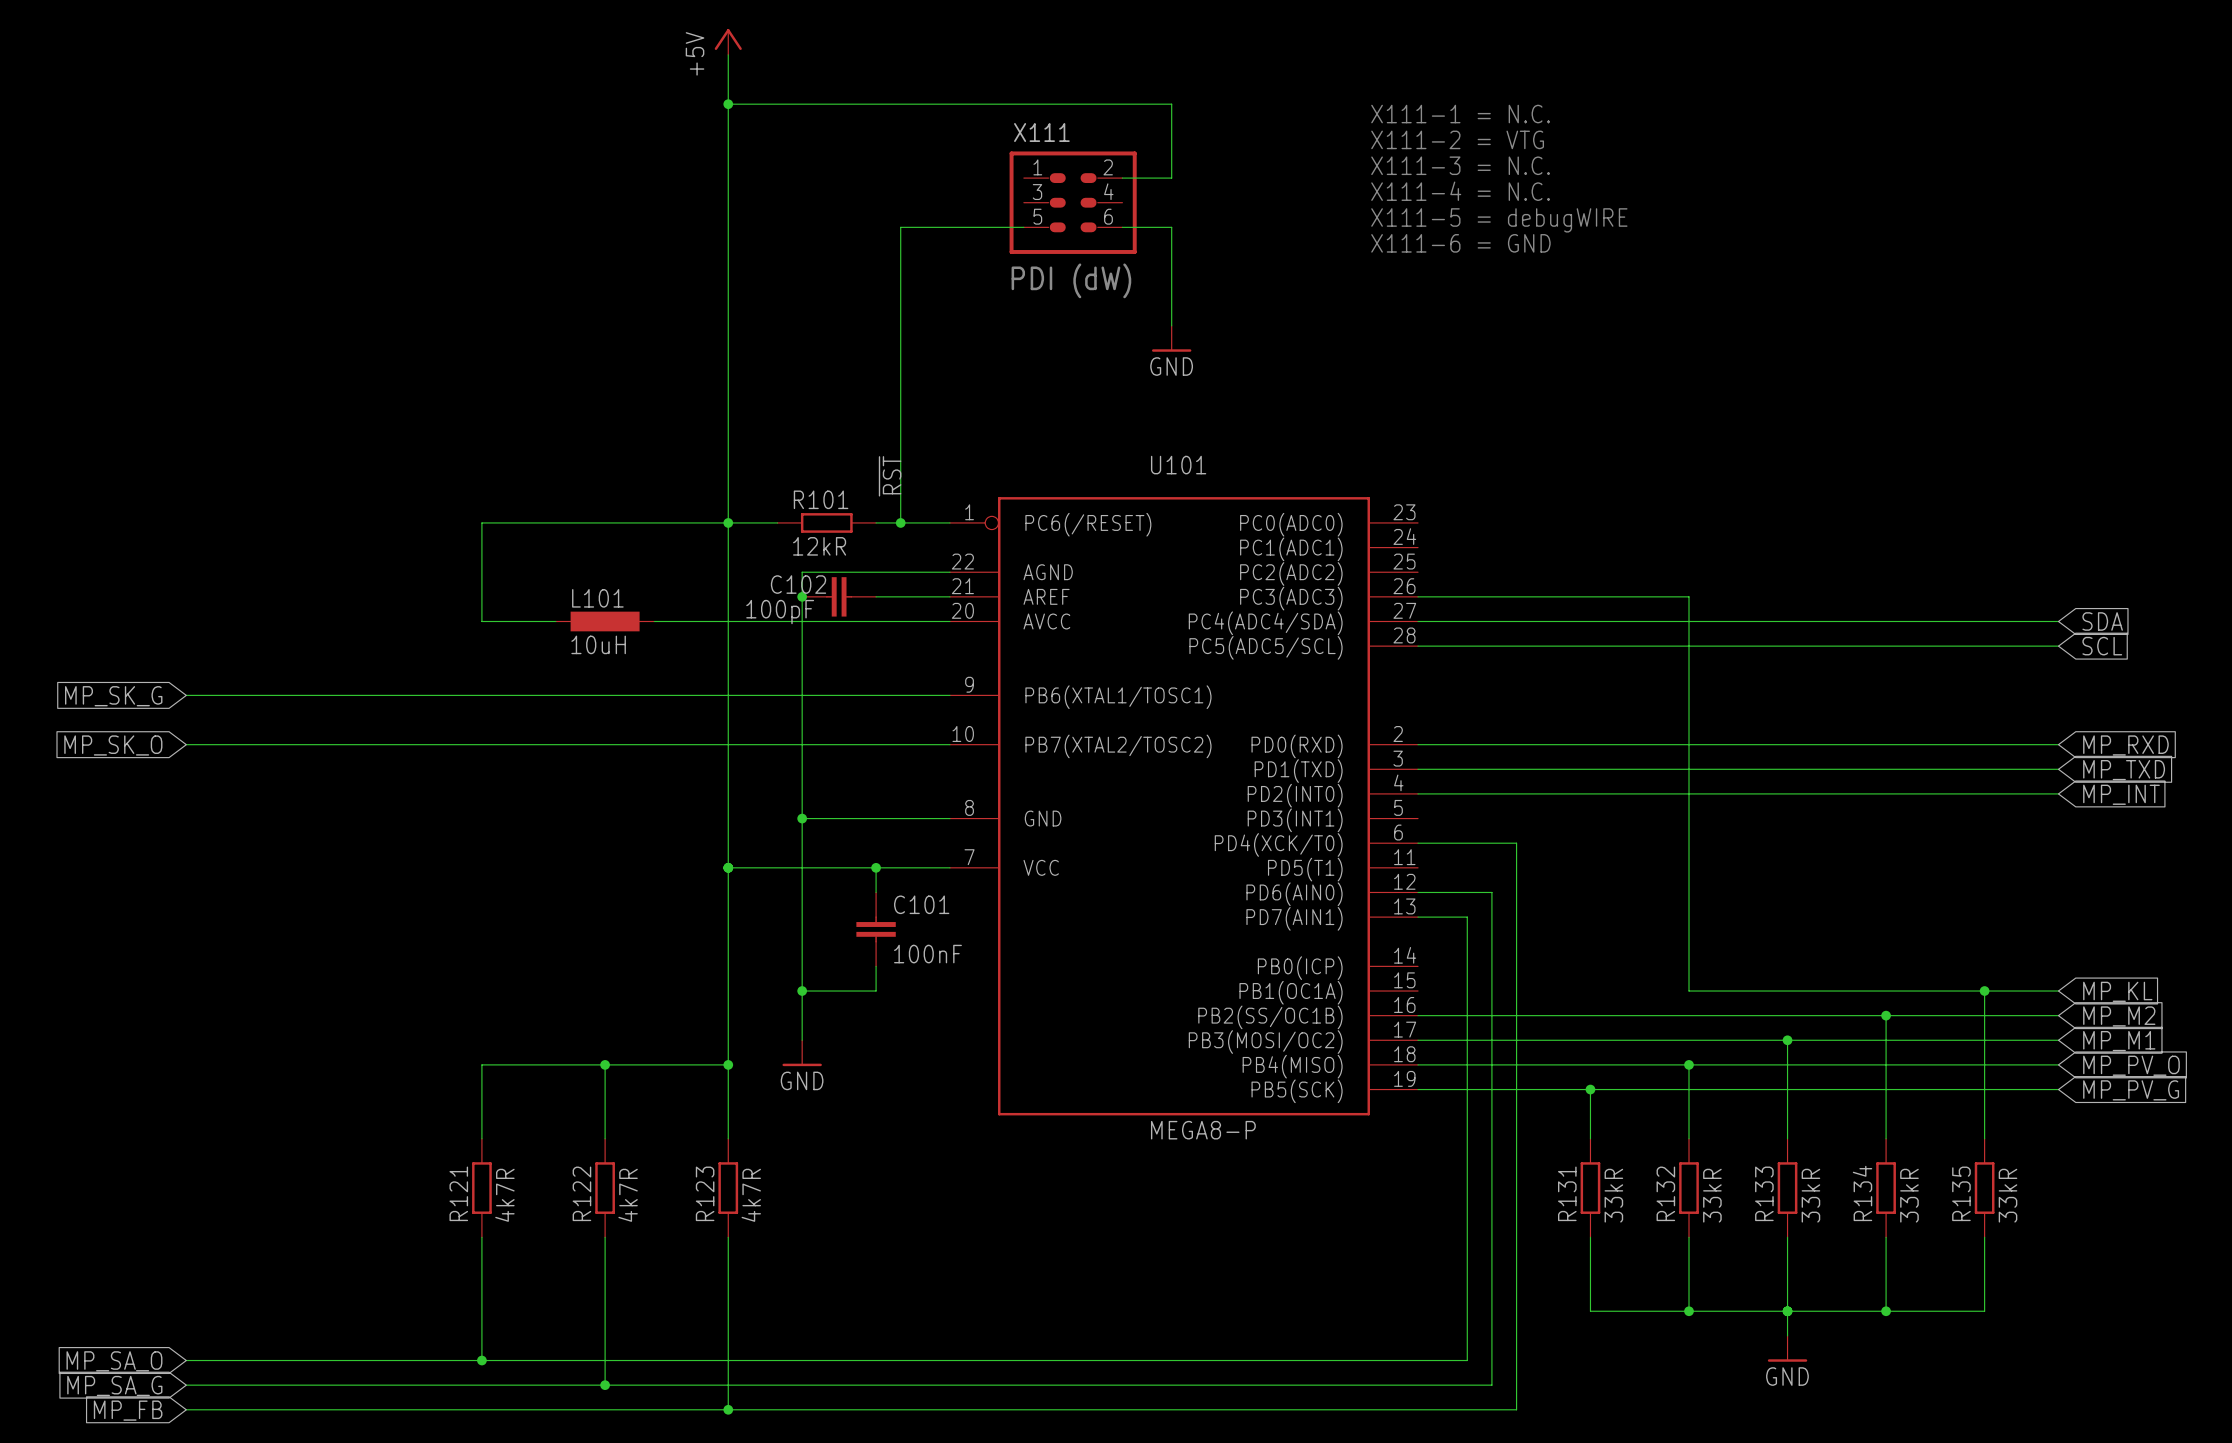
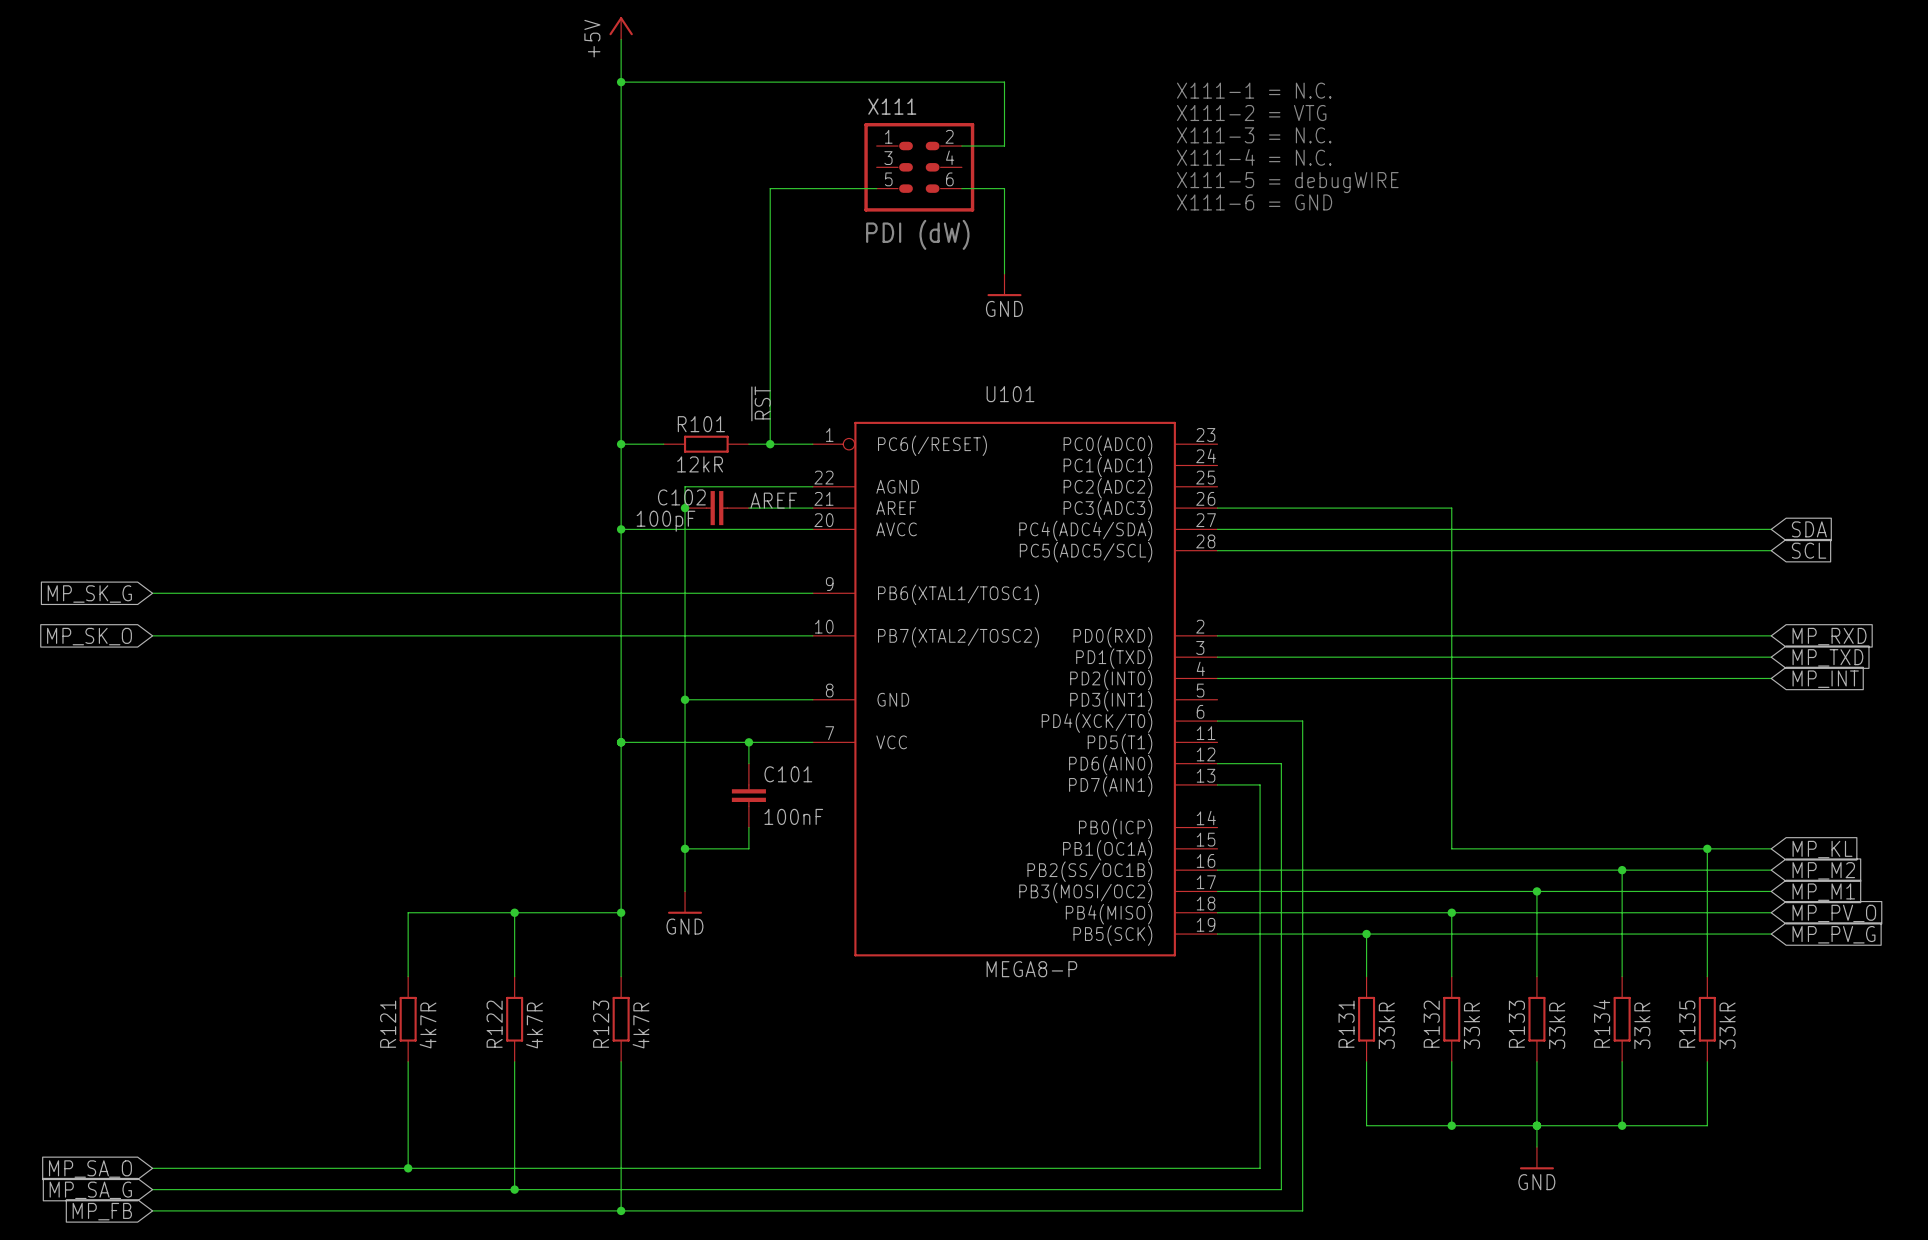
wire: (728, 522) (481, 522) (481, 621) (555, 621) -> none
label: none -> AREF (773, 500)
L101: 10uH (605, 621) -> none
wire: (654, 621) (728, 621) -> none
junction: none -> (621, 529)

